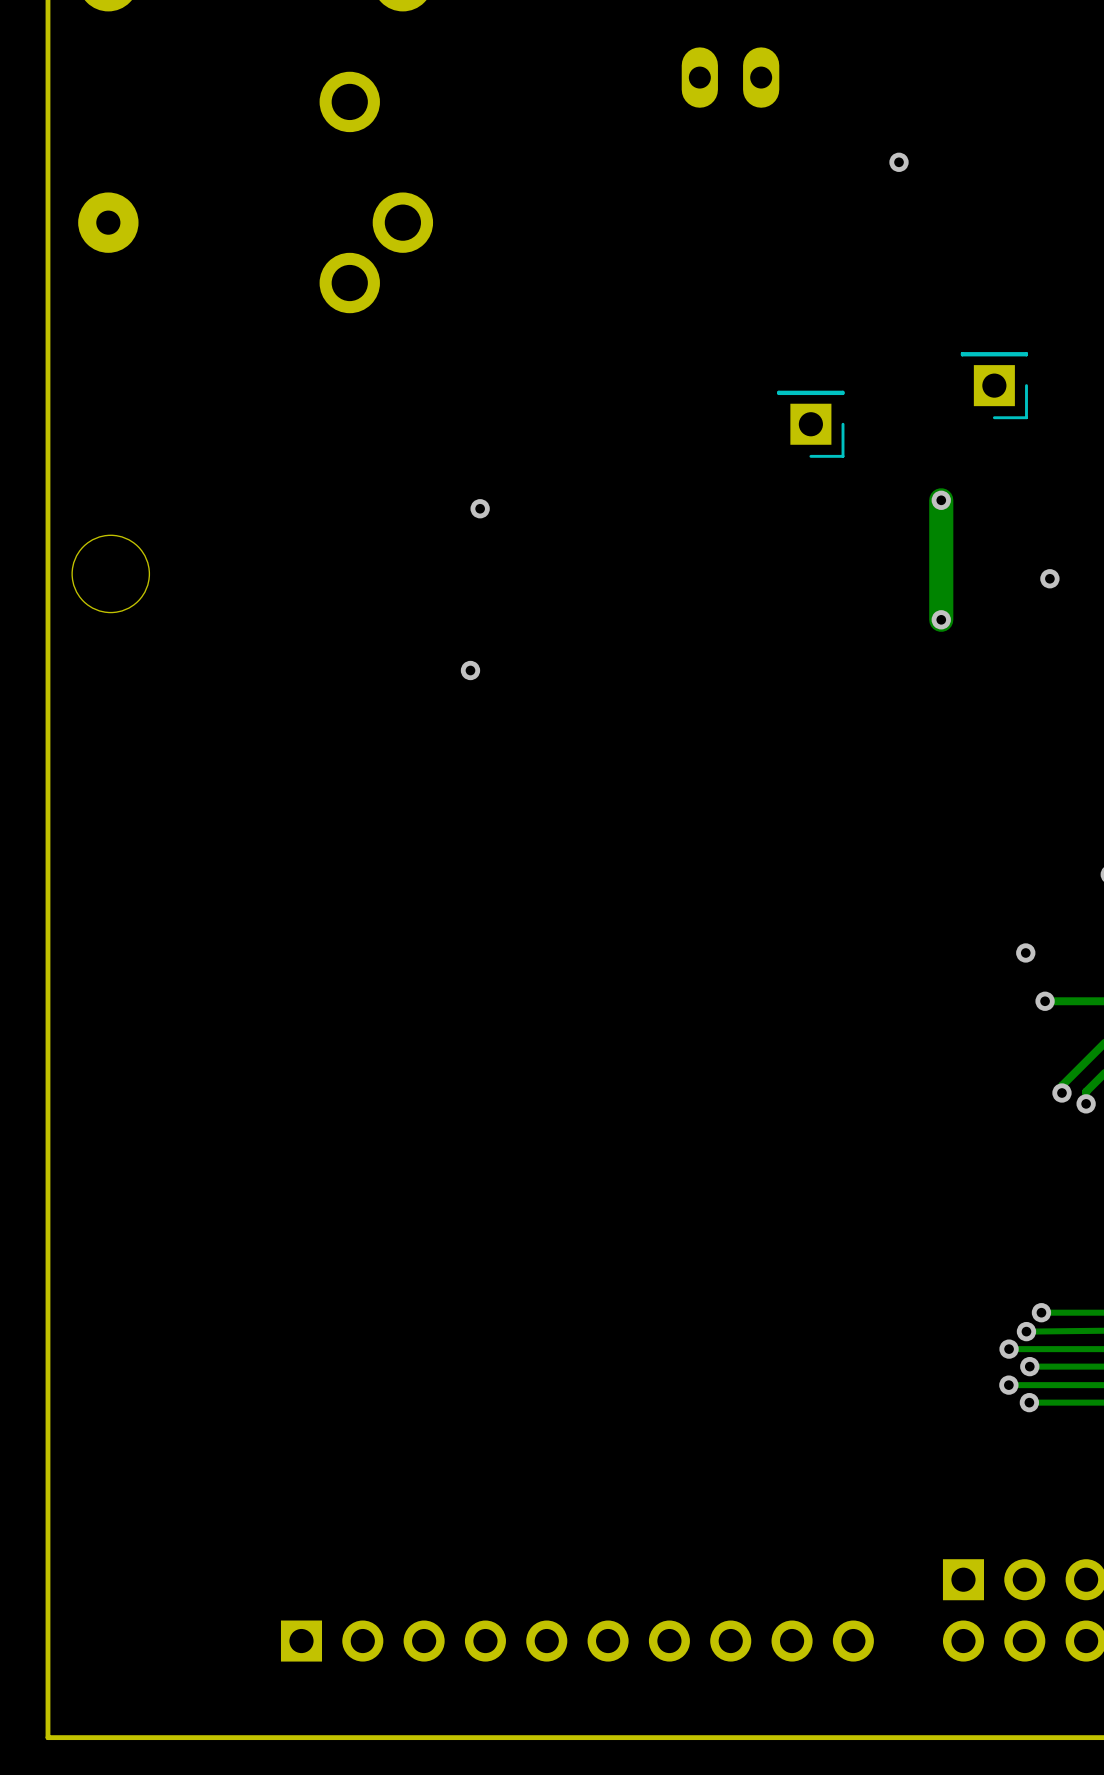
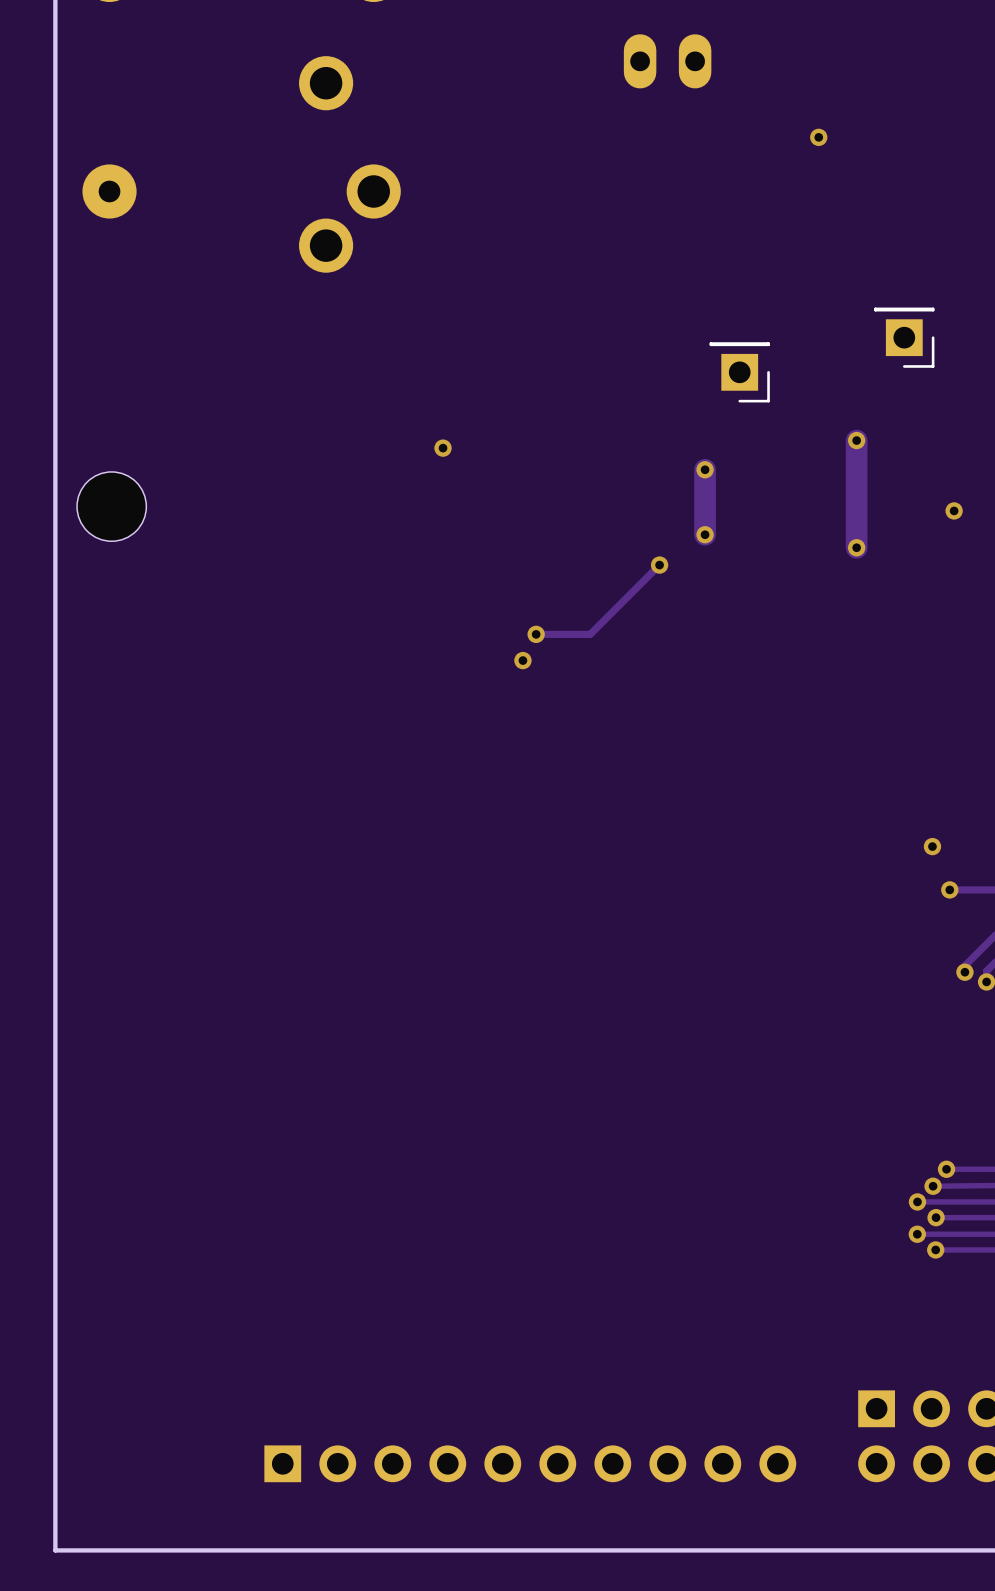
track: none -> (705, 469) (705, 534)
via: none -> (705, 469)
via: none -> (705, 534)
track: none -> (659, 565) (590, 634) (536, 634)
via: none -> (659, 565)
via: (470, 670) -> none
via: none -> (536, 634)
via: none -> (522, 660)

